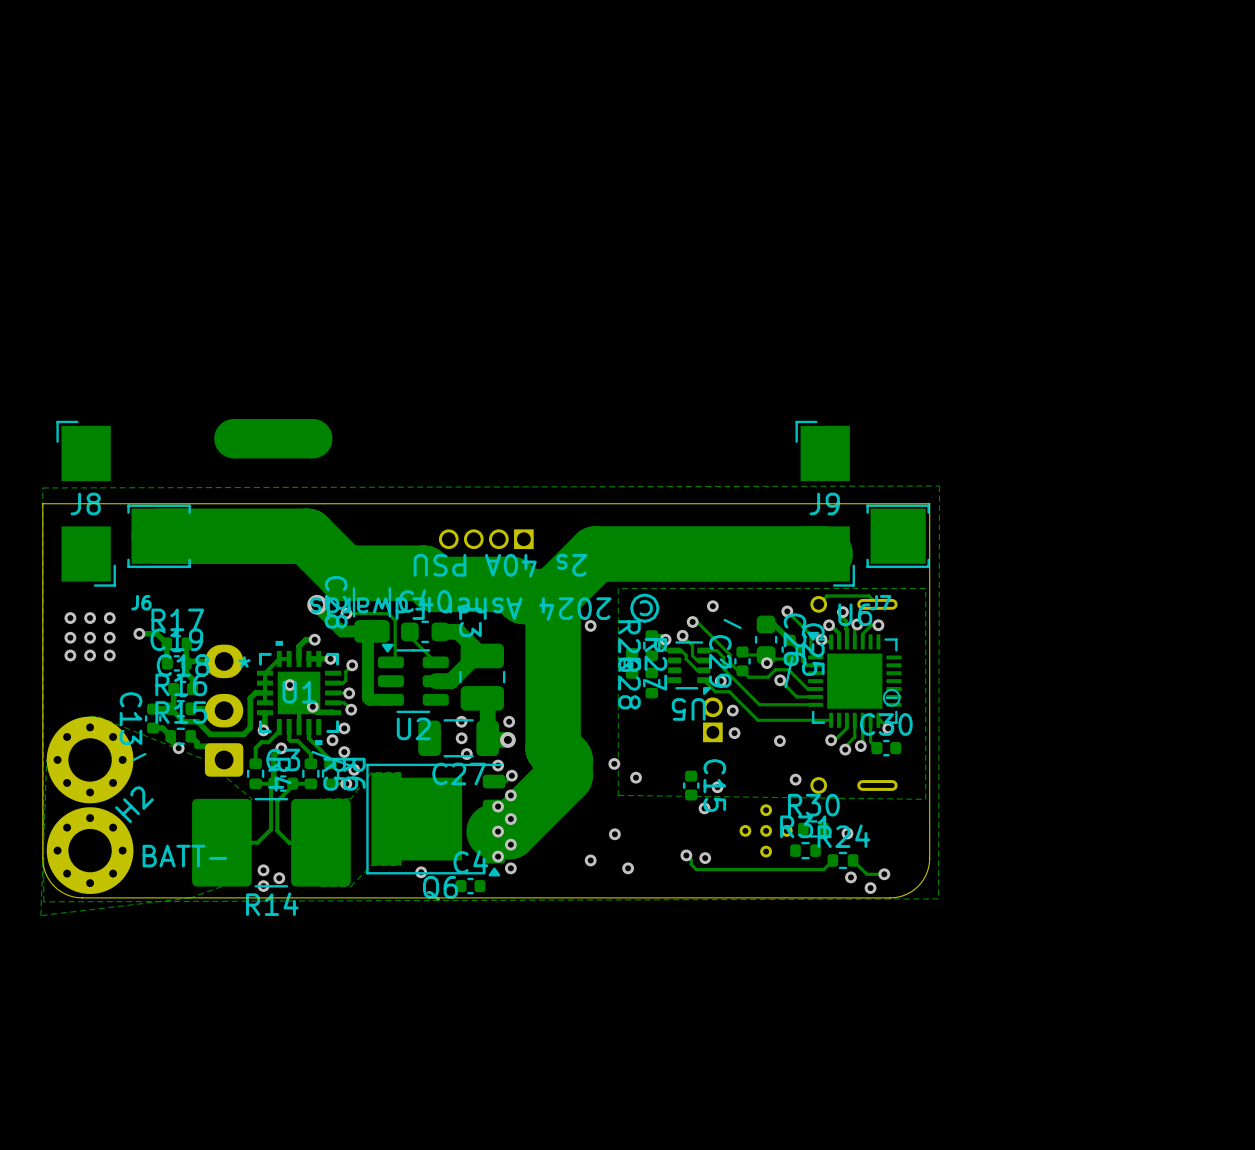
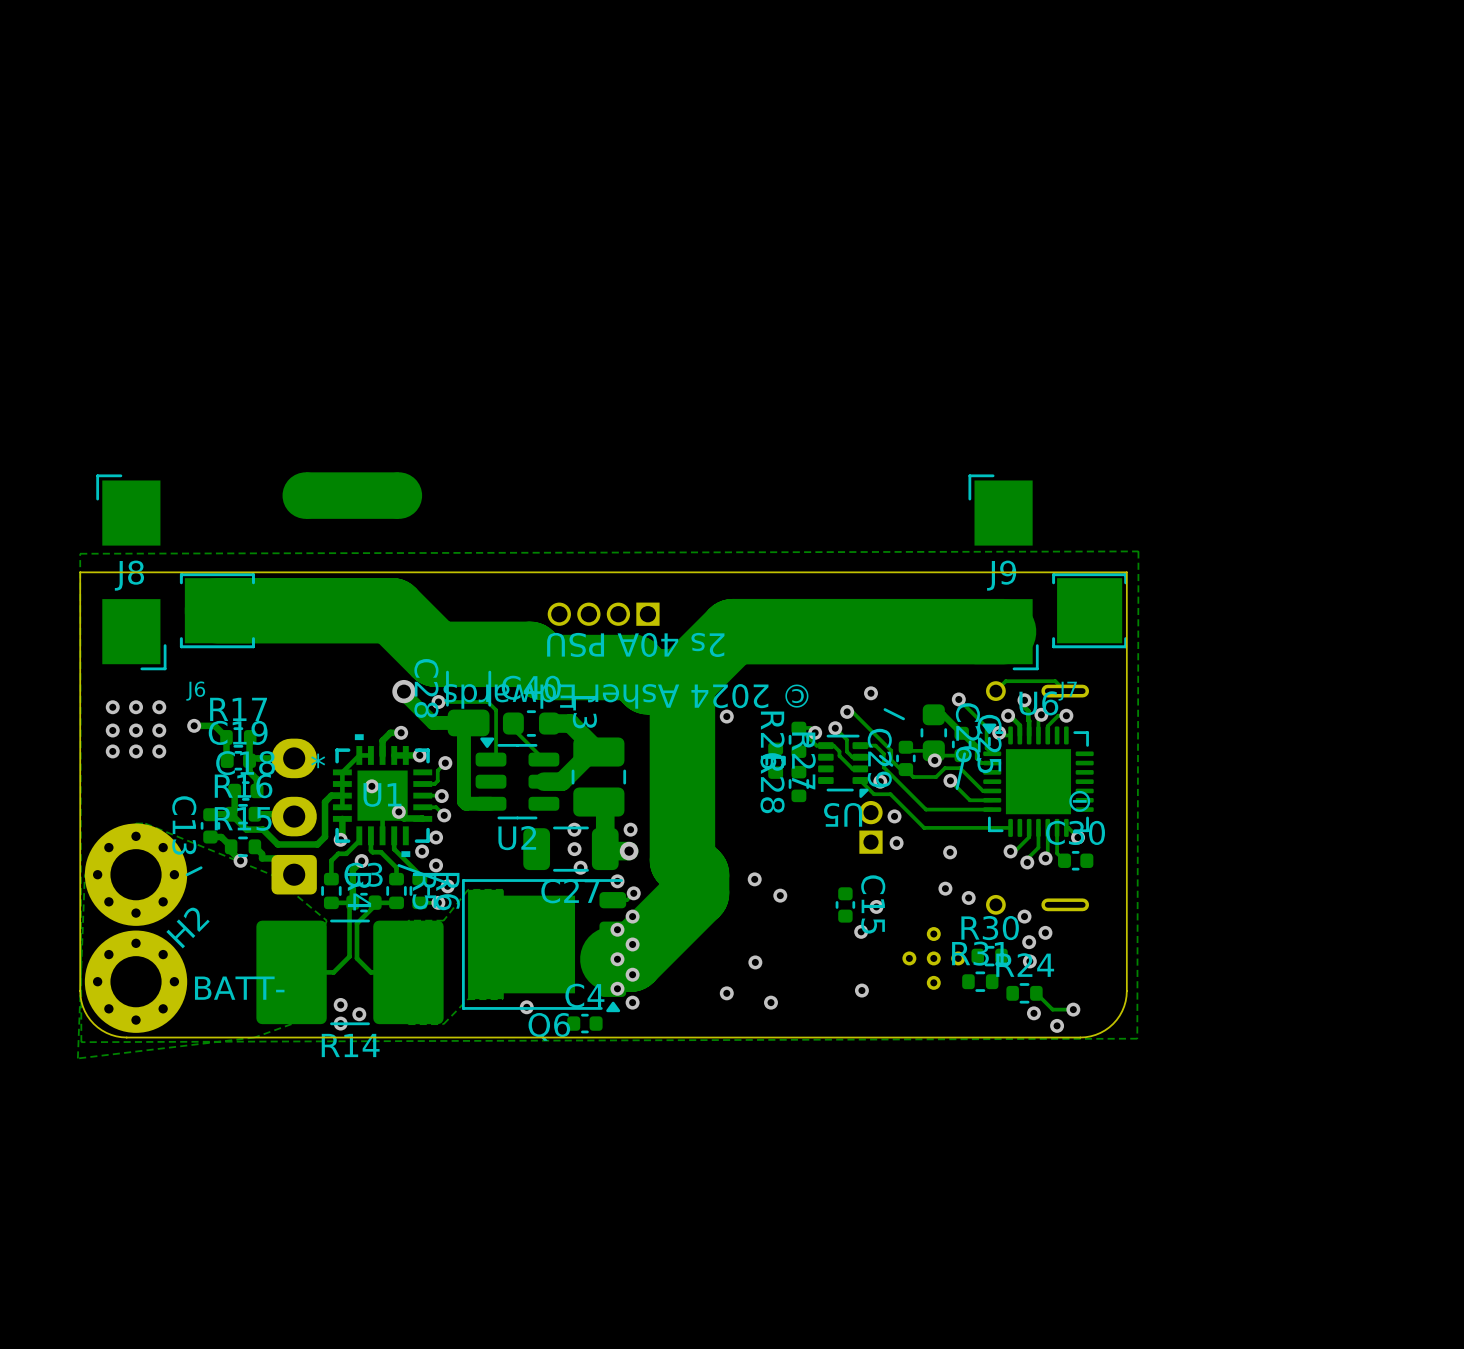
zone outline: (925, 588) (618, 588) (618, 795) (925, 799) (925, 588) -> none
via: none -> (945, 888)
via: none -> (1024, 916)
via: none -> (1045, 932)
via: none -> (1029, 942)
track: (686, 855) (696, 869) (823, 869) (832, 860) -> none
via: (686, 855) -> none

